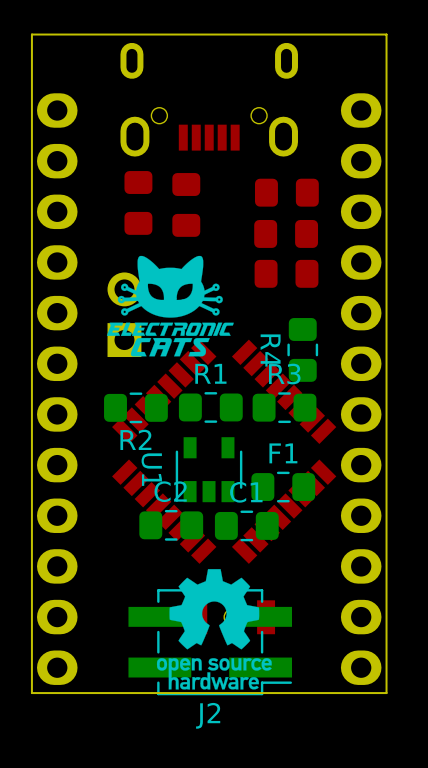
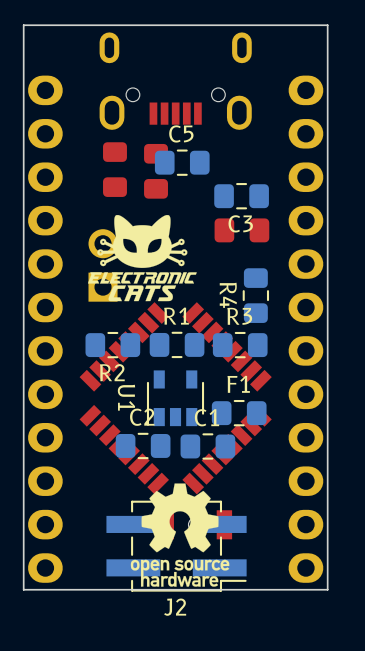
C5 side: top (286, 192) -> bottom (182, 162)
C3 side: top (286, 233) -> bottom (241, 196)
part position: (224, 451) -> (175, 398)

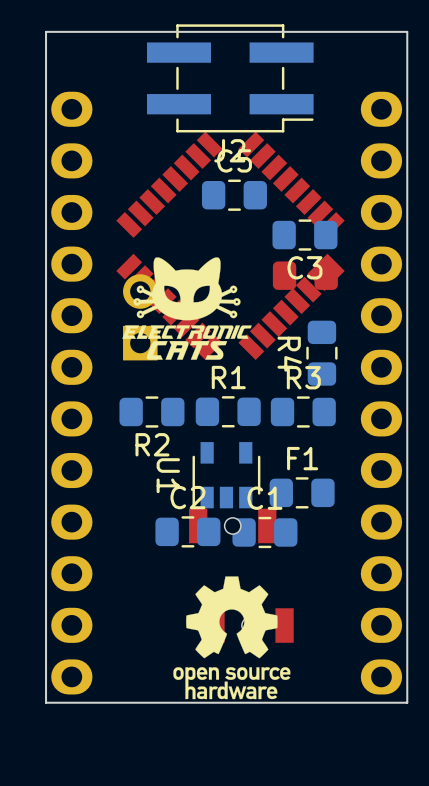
part: (175, 81) -> none
part: (114, 169) -> none
part: (156, 171) -> none
part position: (175, 398) -> (230, 245)
part: none -> (232, 525)
J2 position: (176, 546) -> (230, 78)

